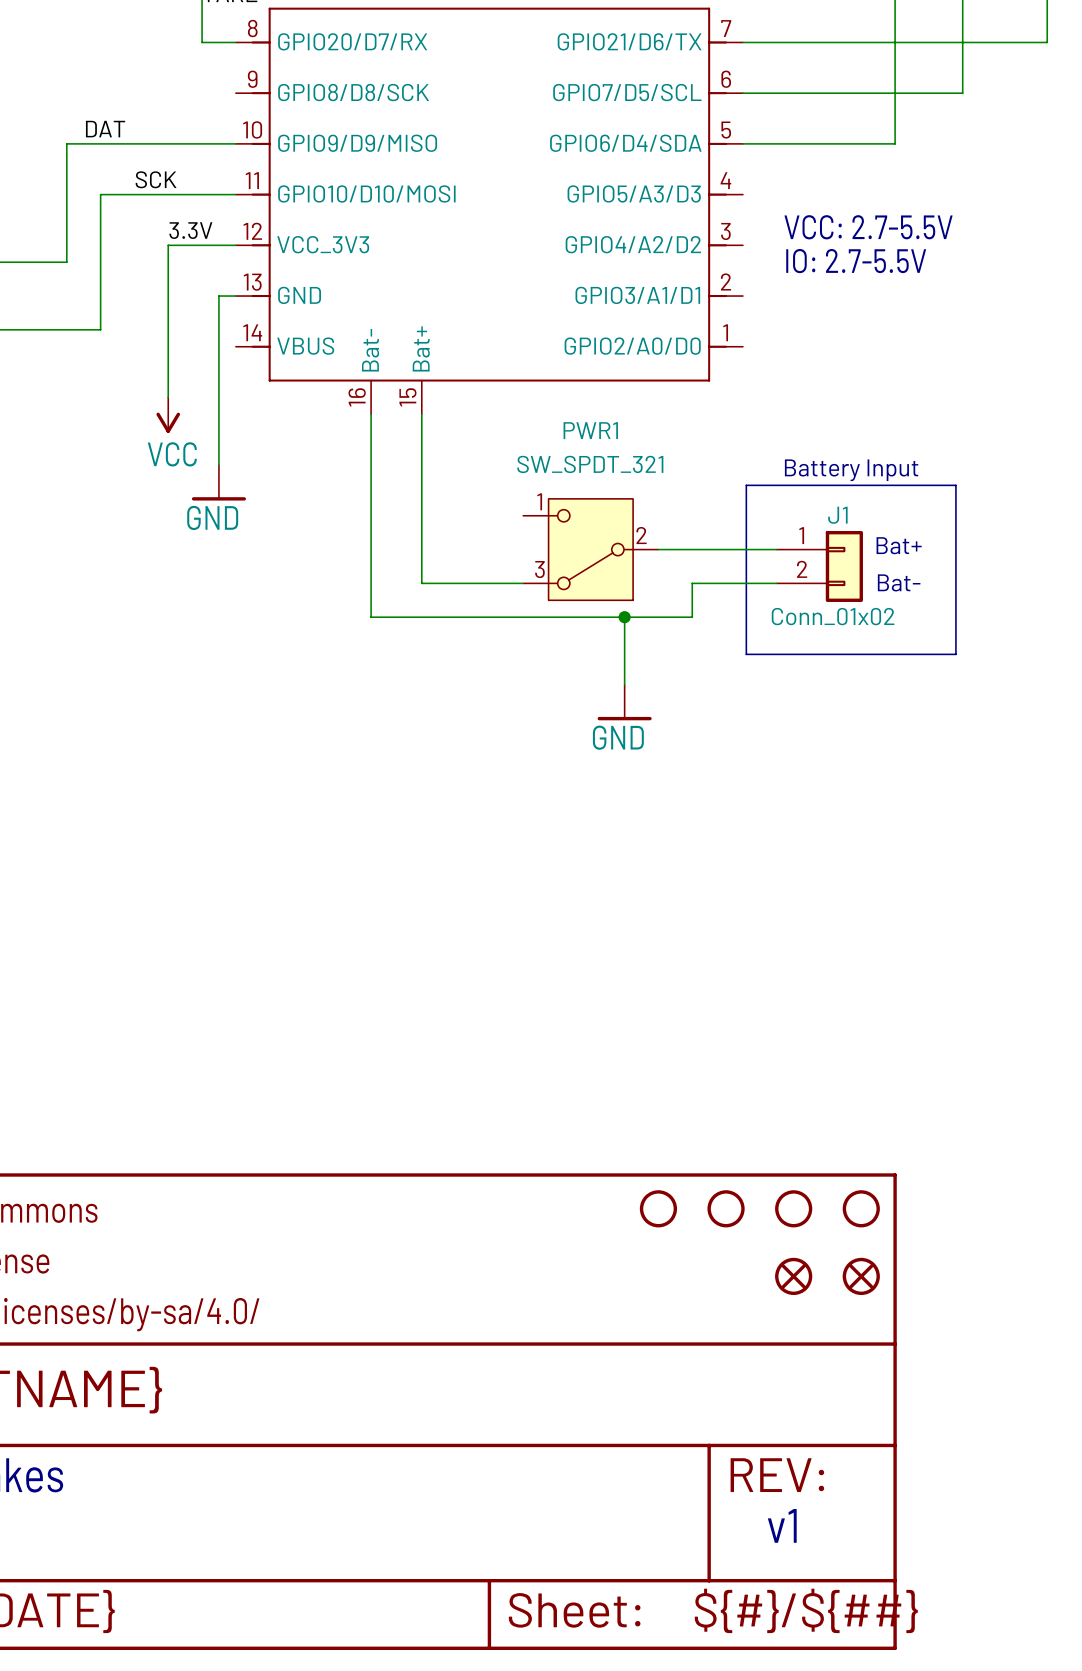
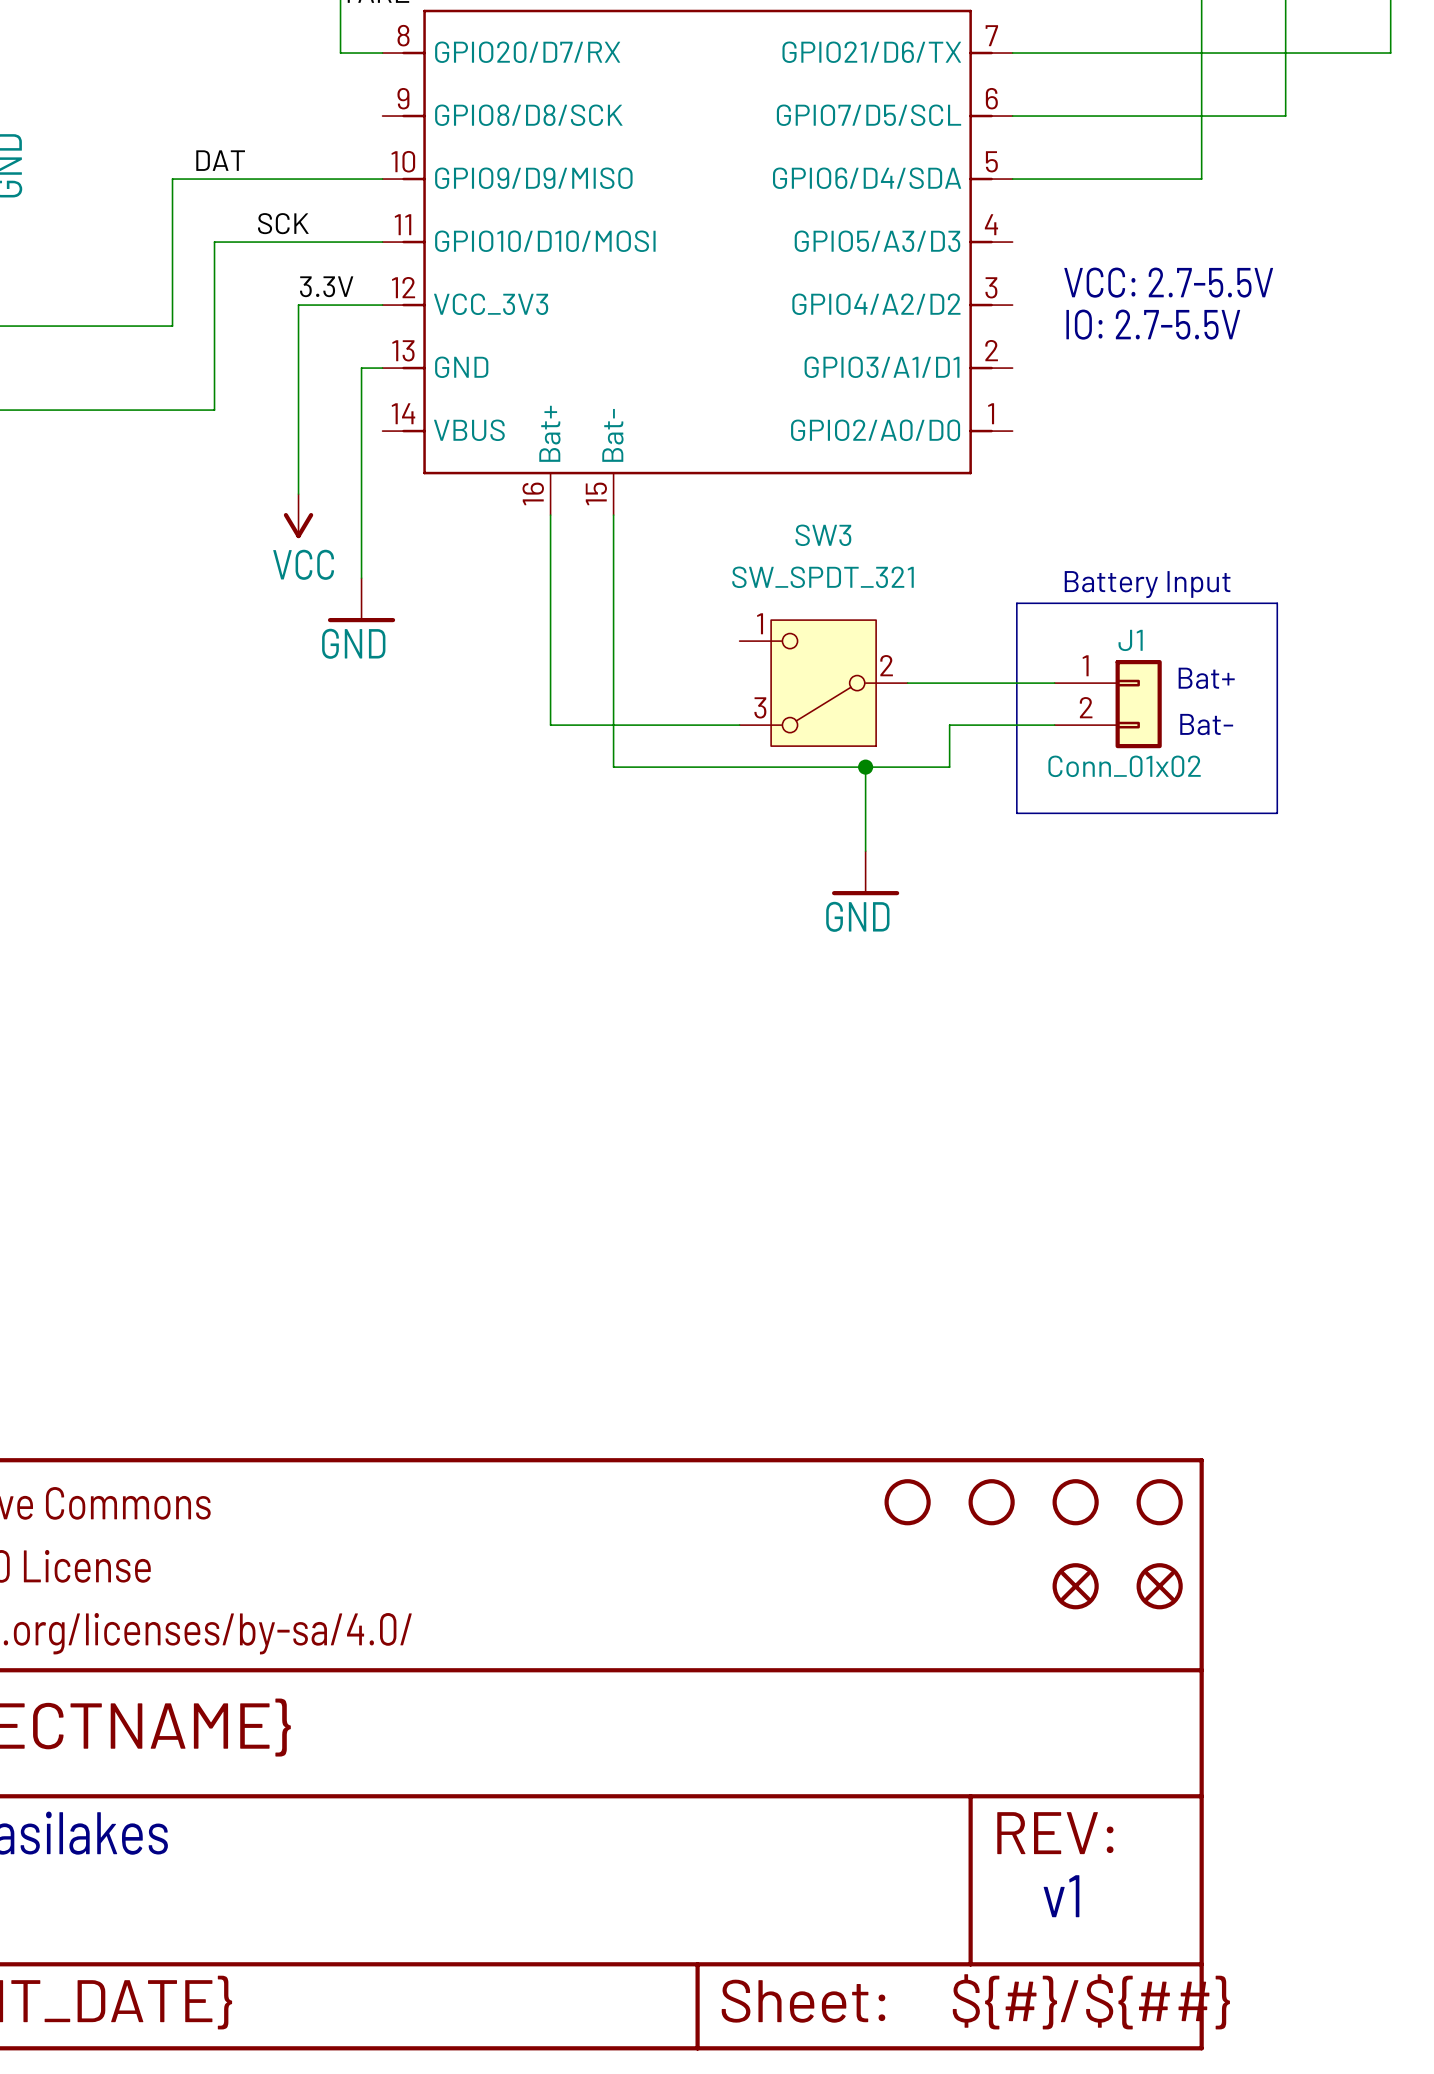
part pin name: Bat+ (421, 348) -> Bat- (612, 435)
part pin name: Bat- (370, 350) -> Bat+ (549, 433)
PWR1 name: PWR1 (590, 430) -> SW3 (823, 535)
wire: (371, 583) (371, 617) (421, 617) -> (550, 725) (613, 725) (613, 767)

